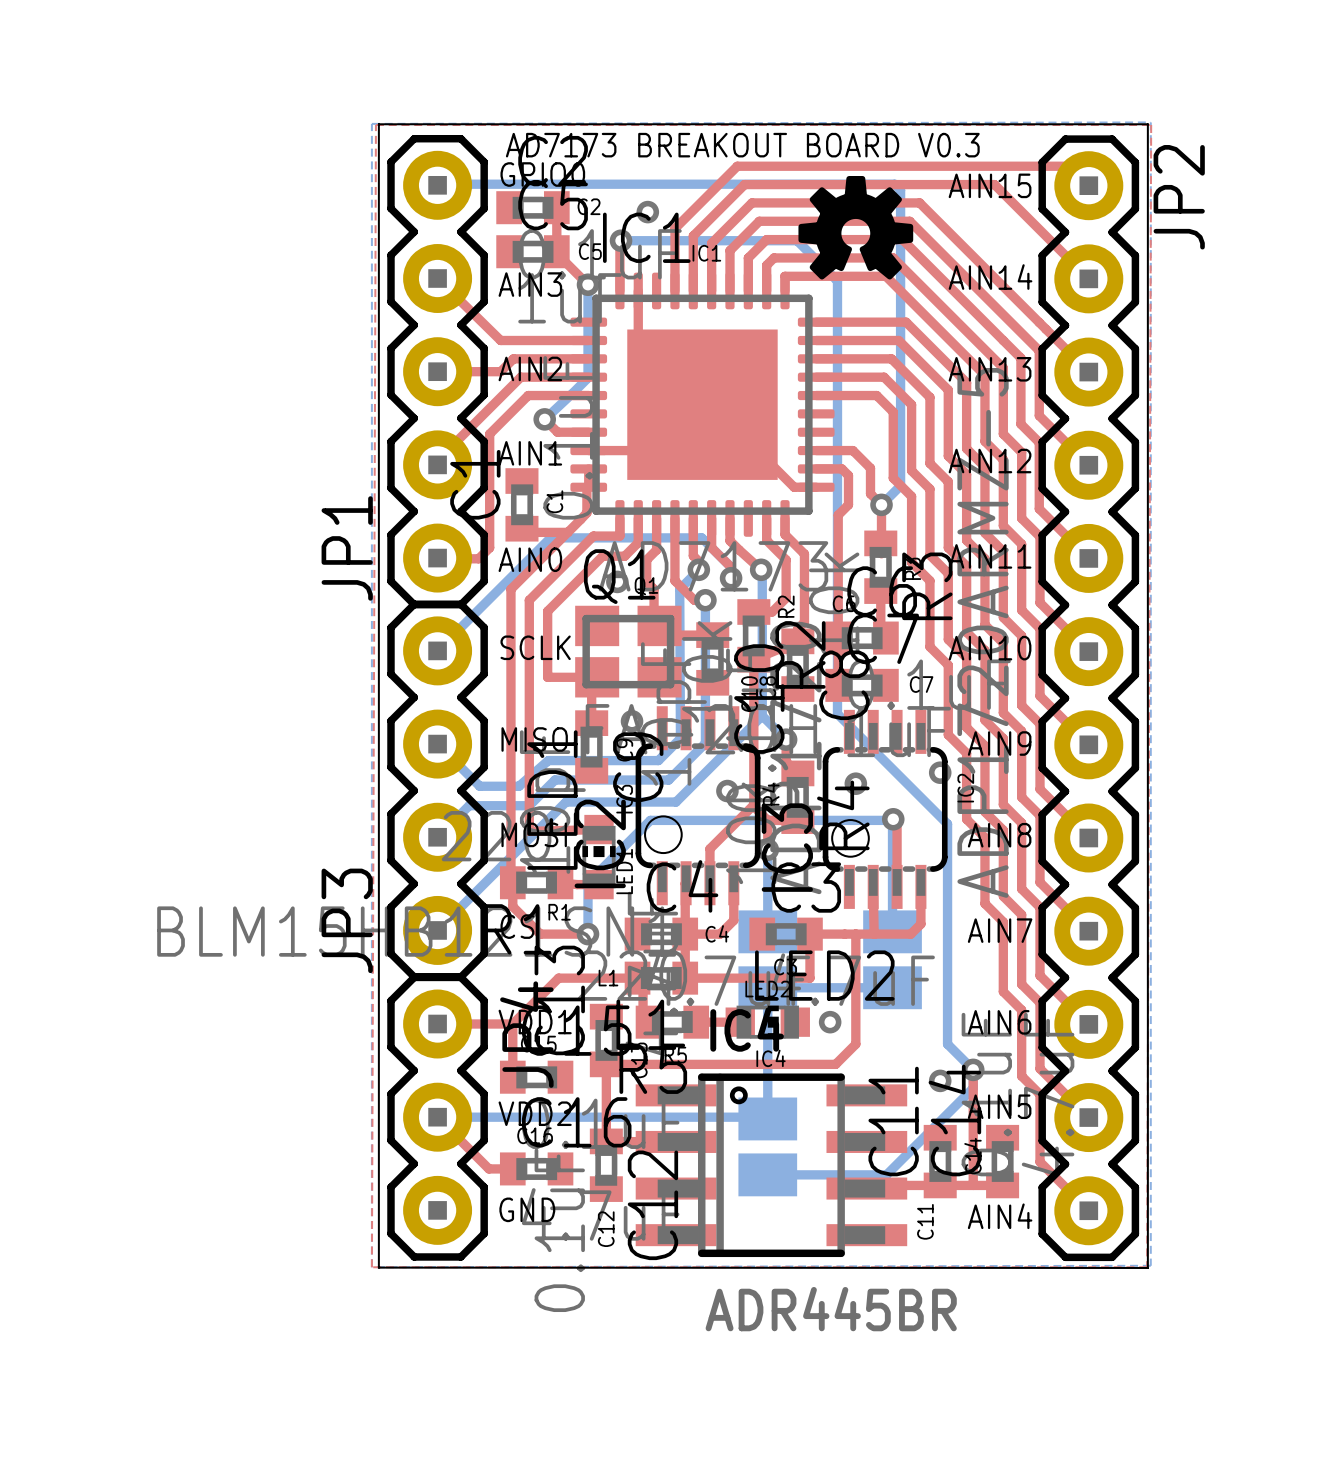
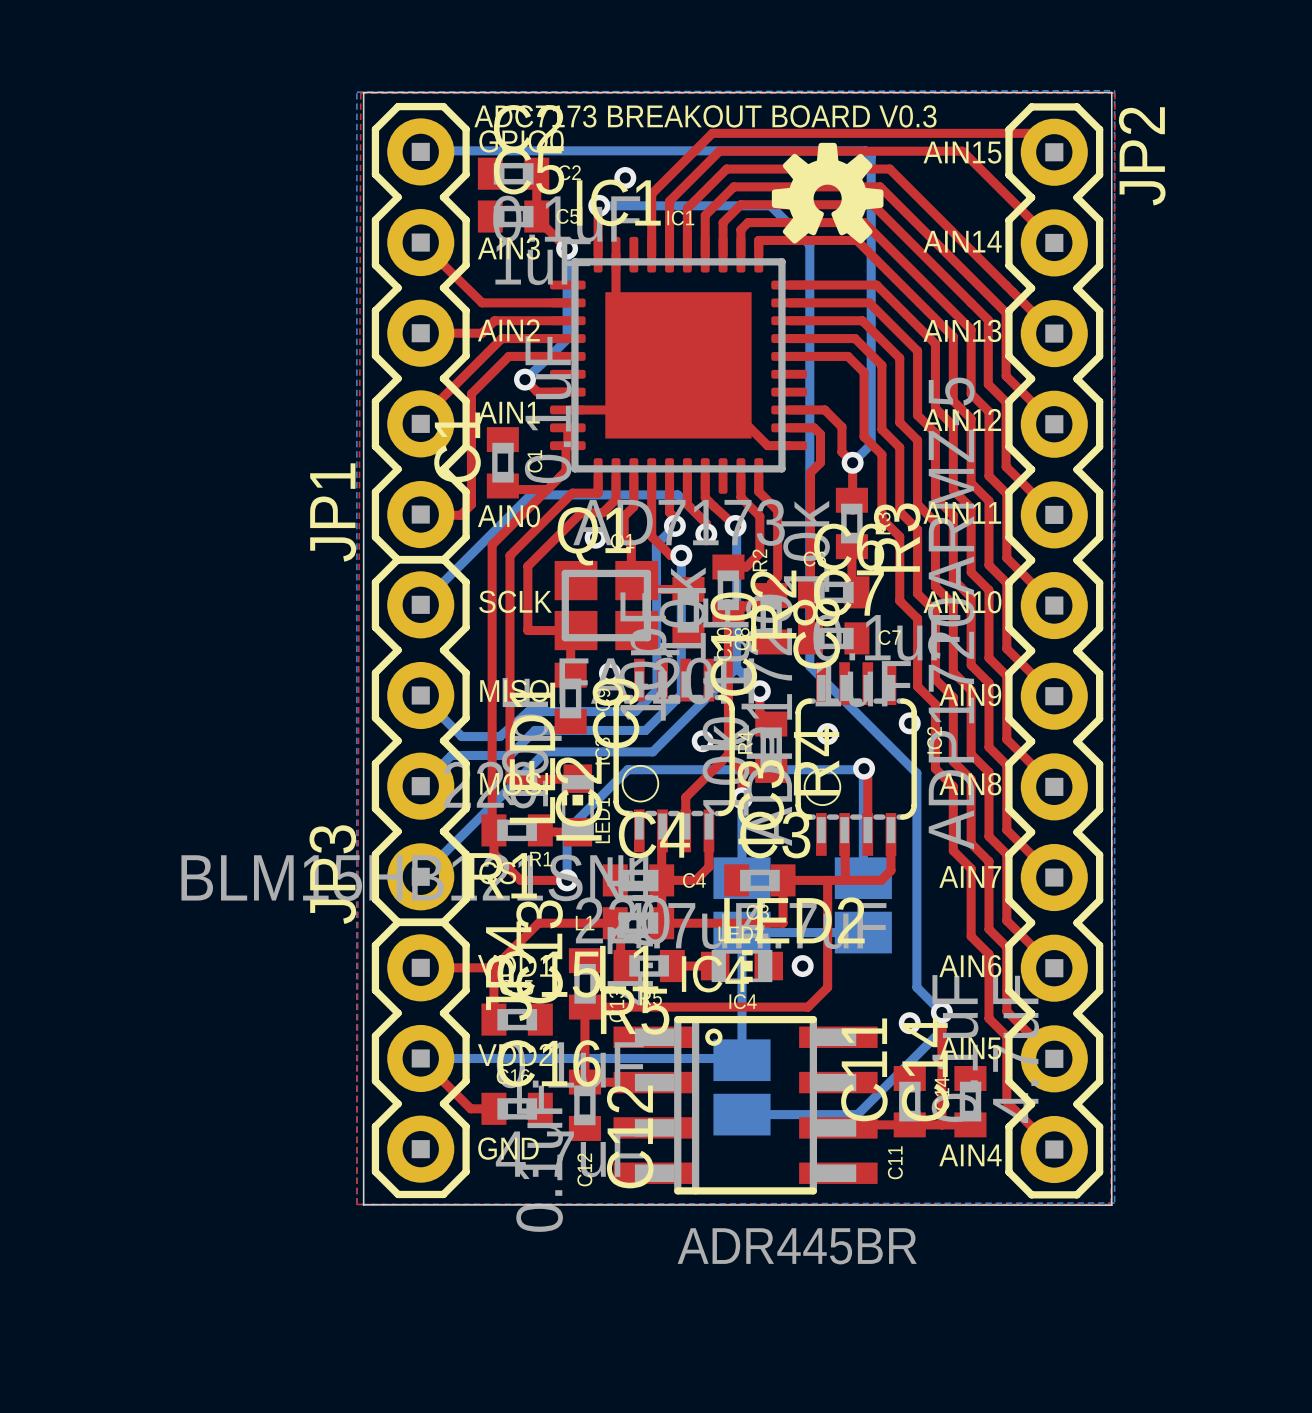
text: AD7173 BREAKOUT BOARD V0.3 (742, 145) -> ADC7173 BREAKOUT BOARD V0.3 (705, 116)

